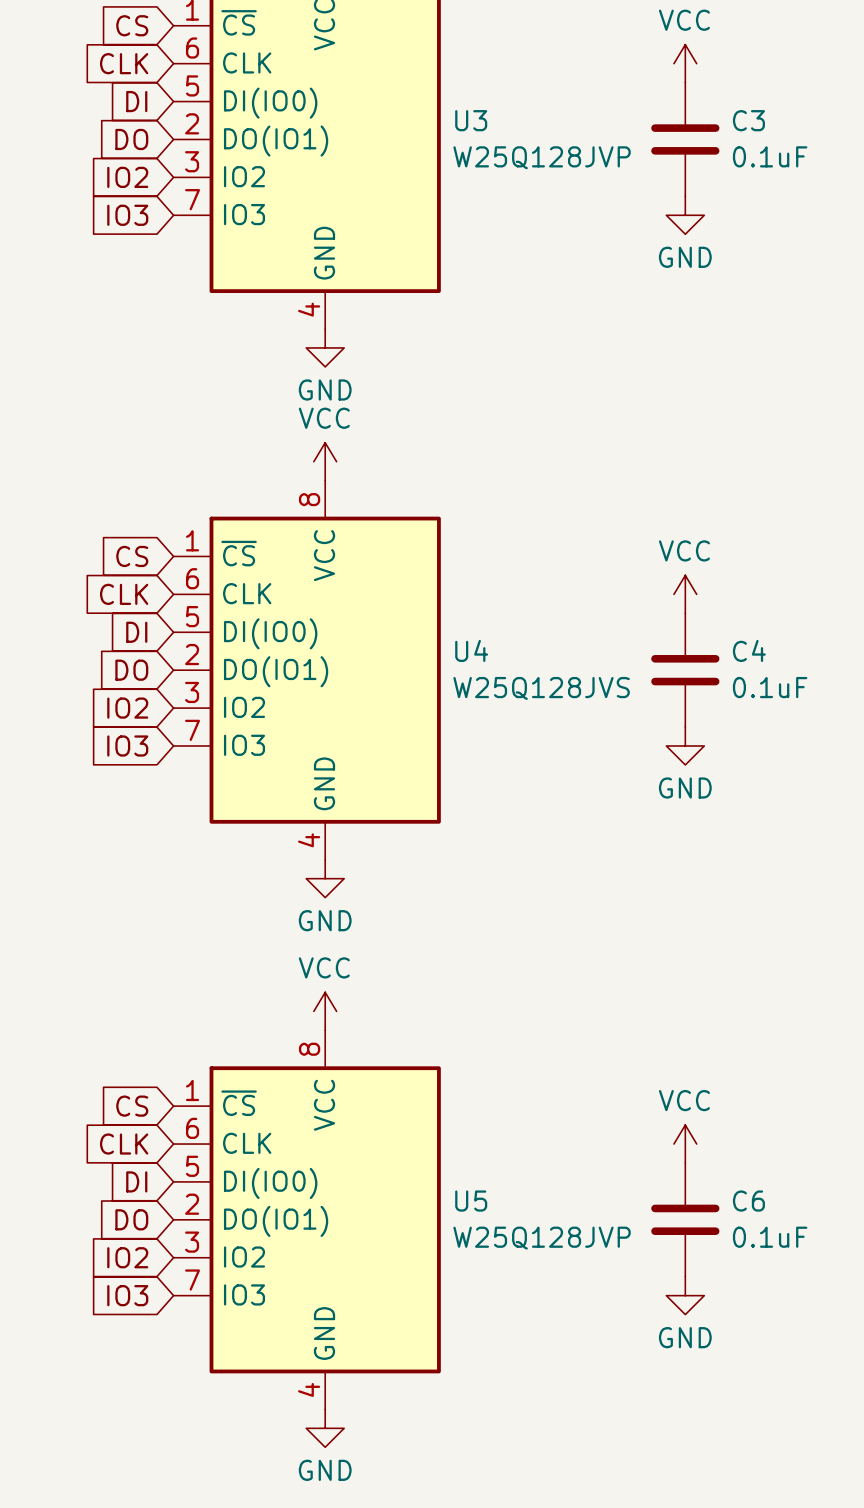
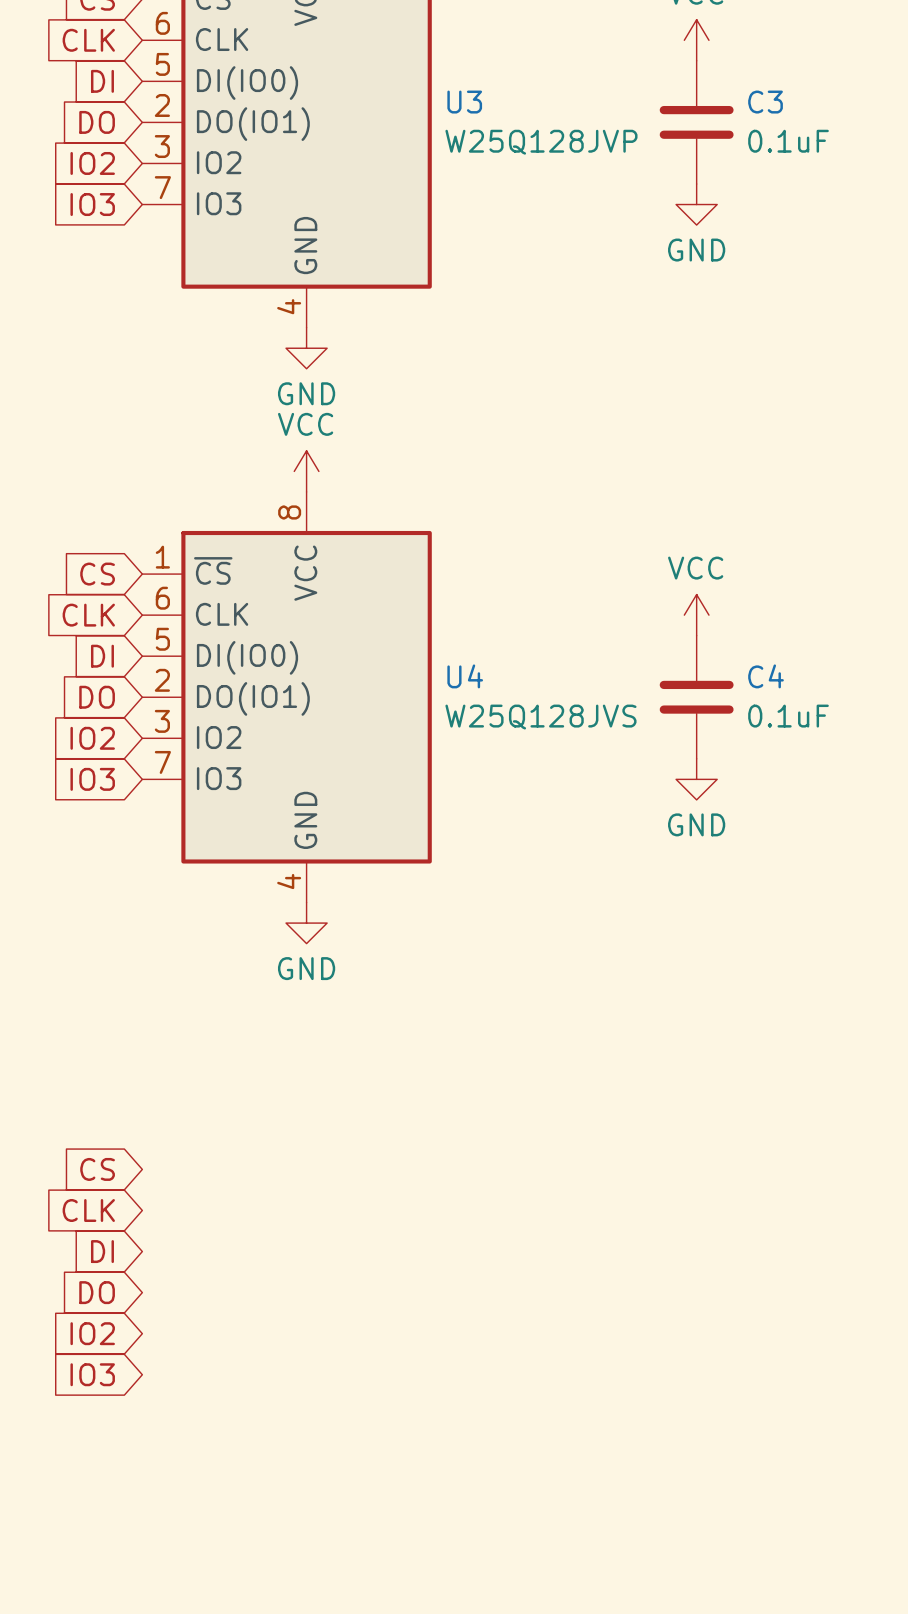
power symbol: VCC (325, 1011) -> none
power symbol: VCC (685, 1144) -> none
U5: W25Q128JVP (307, 1219) -> none
C6: 0.1uF (685, 1219) -> none
power symbol: GND (685, 1295) -> none
power symbol: GND (325, 1428) -> none

